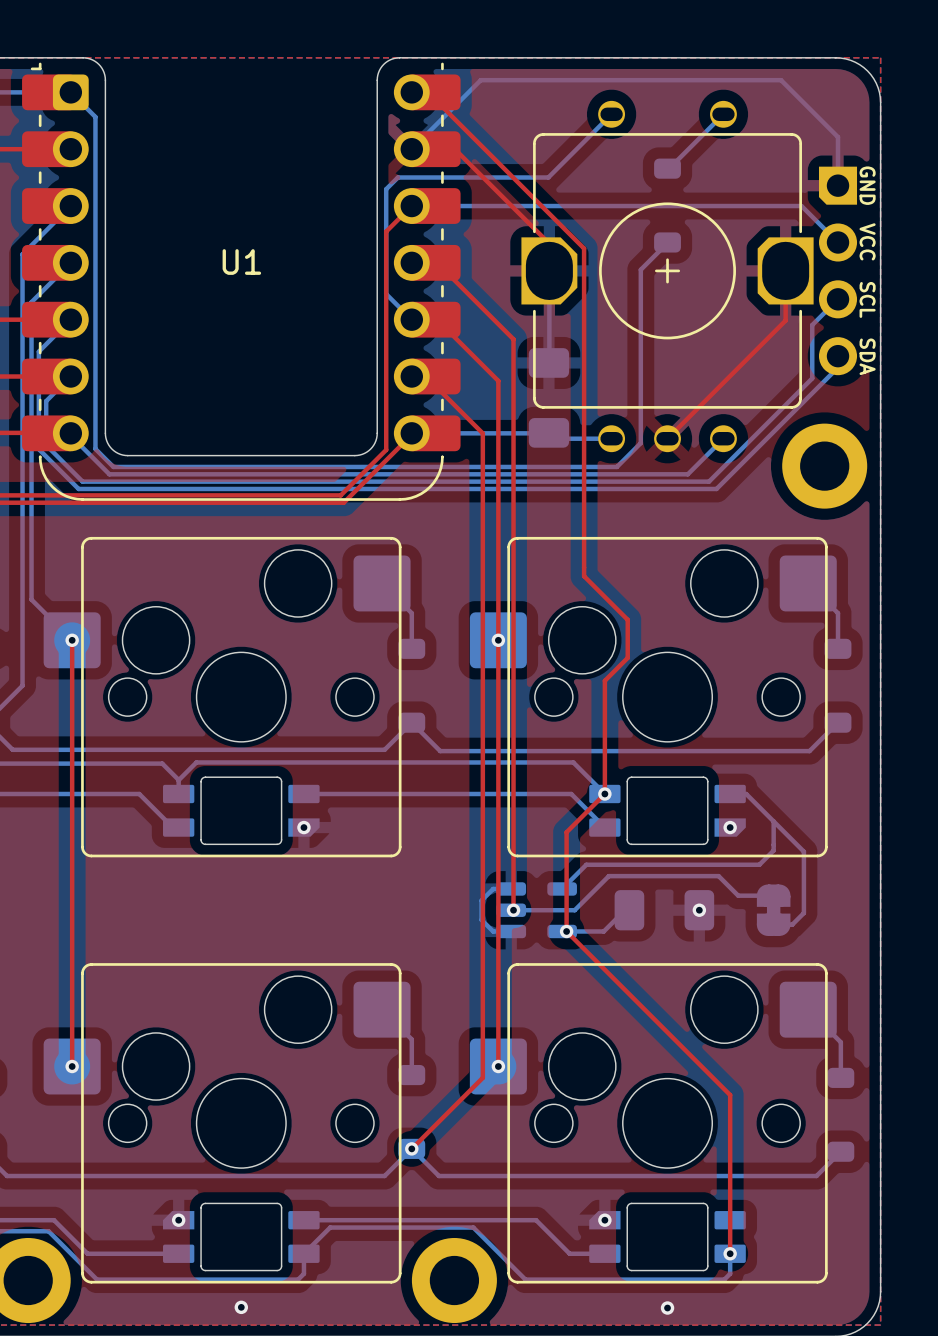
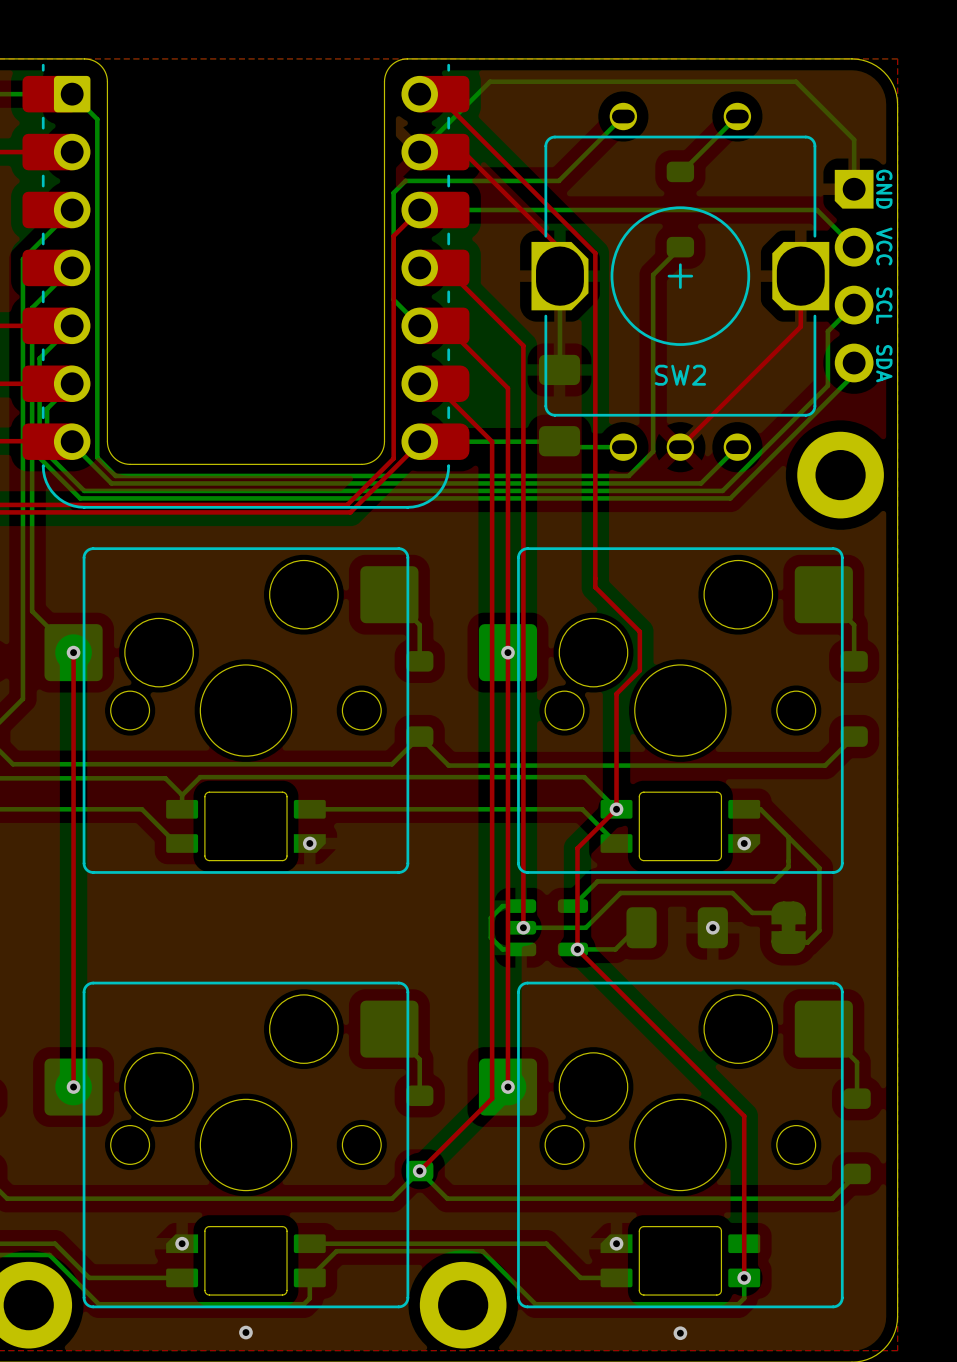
part: (667, 276) -> none
SW2: none -> (680, 281)
part: none -> (245, 286)
U1: (241, 281) -> none

